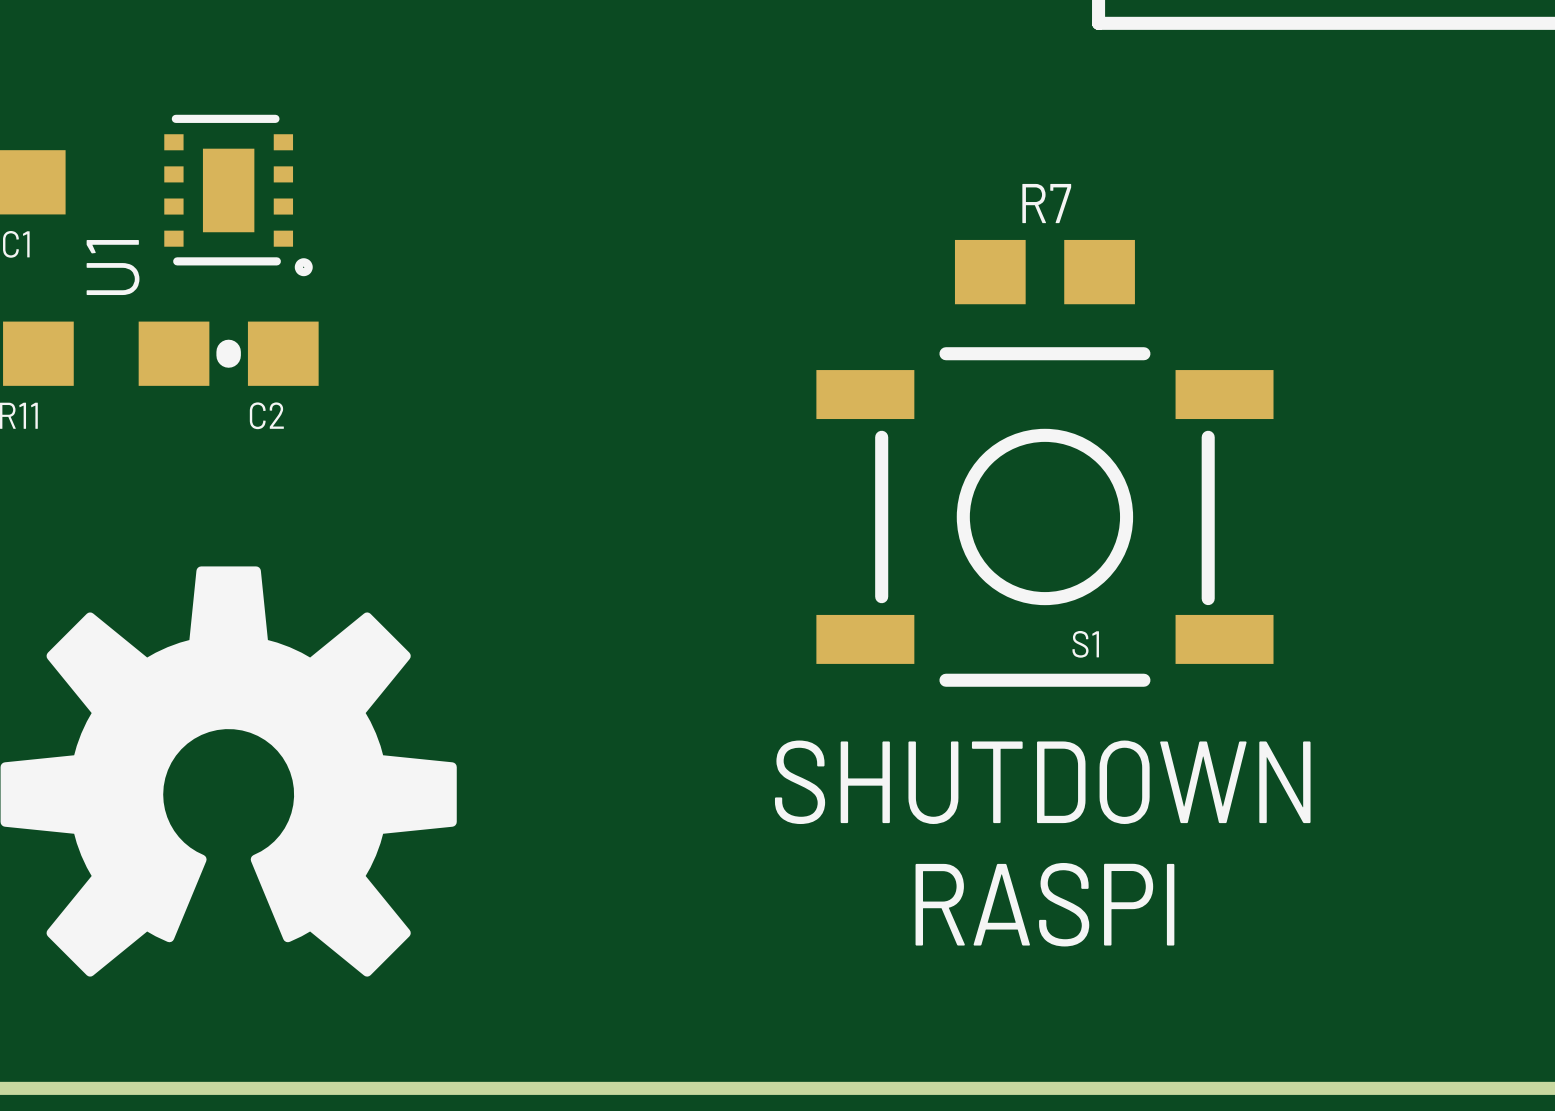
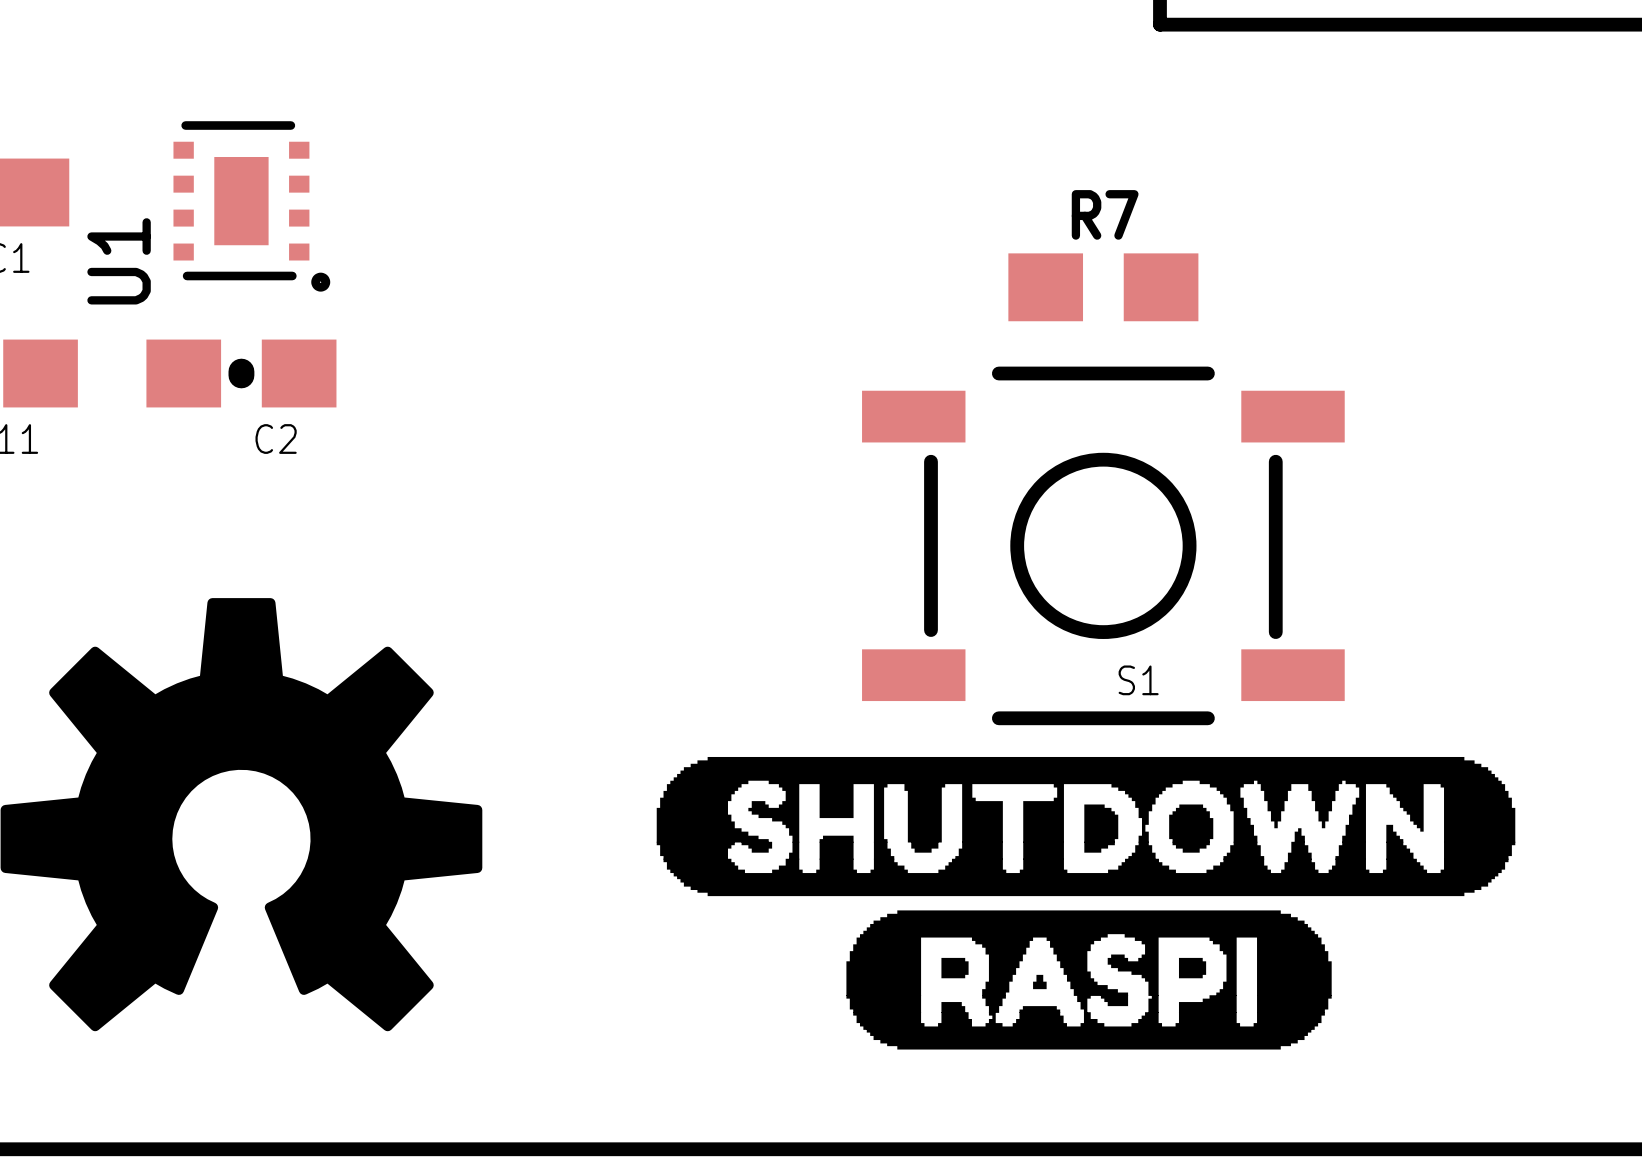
drawing: none -> [656, 756, 1516, 1050]
text: SHUTDOWN (1042, 782) -> none
text: RASPI (1044, 904) -> none

